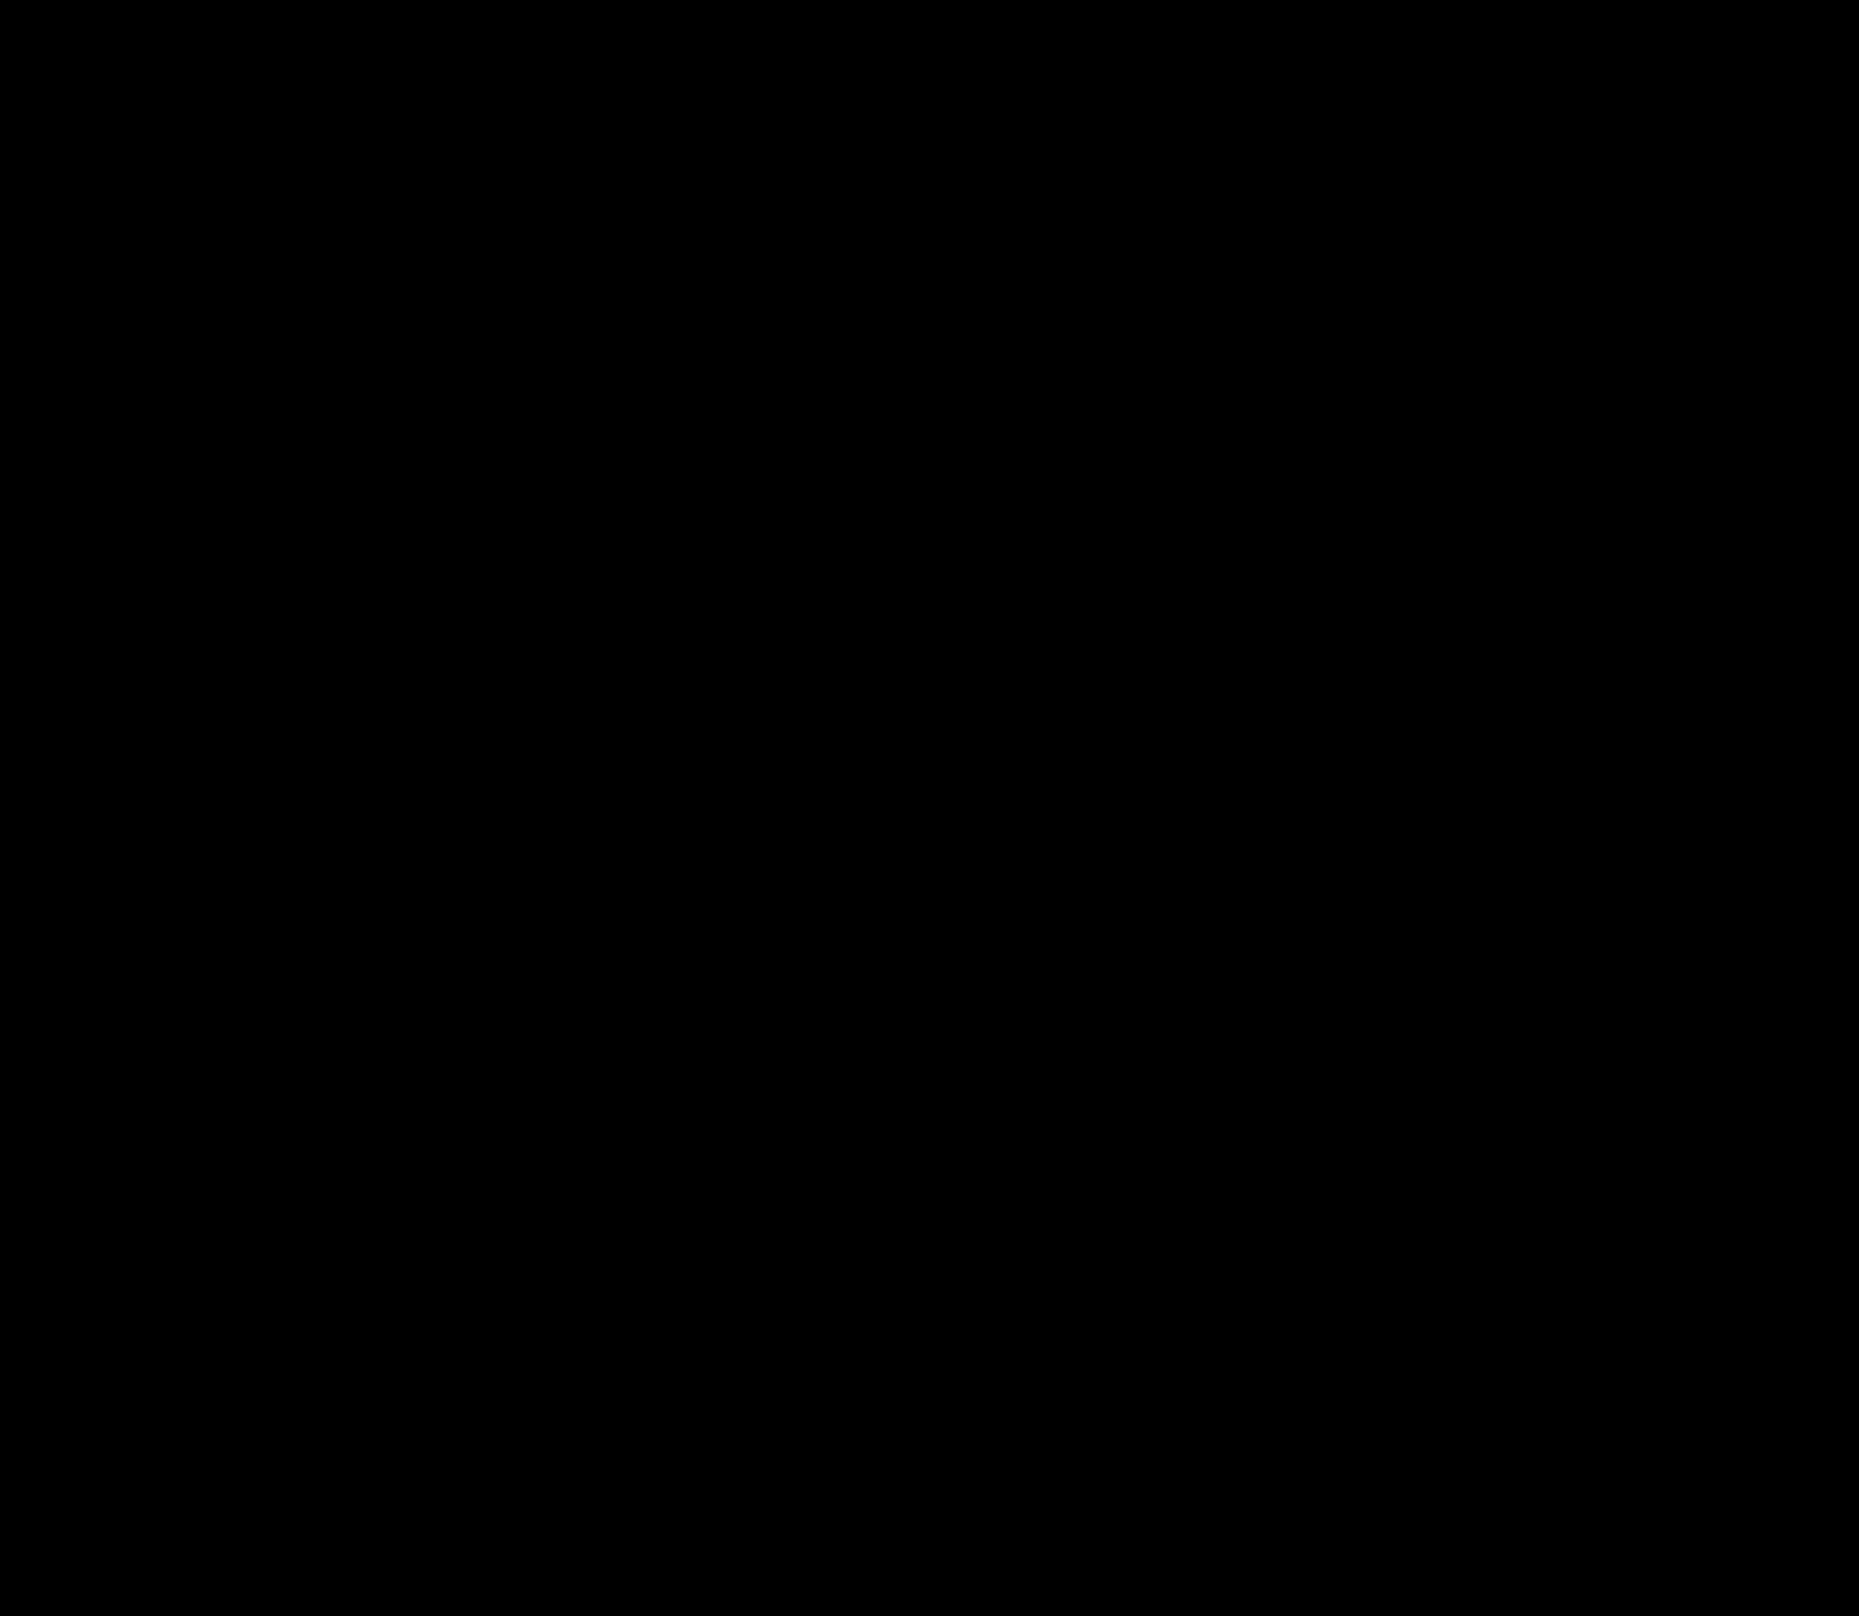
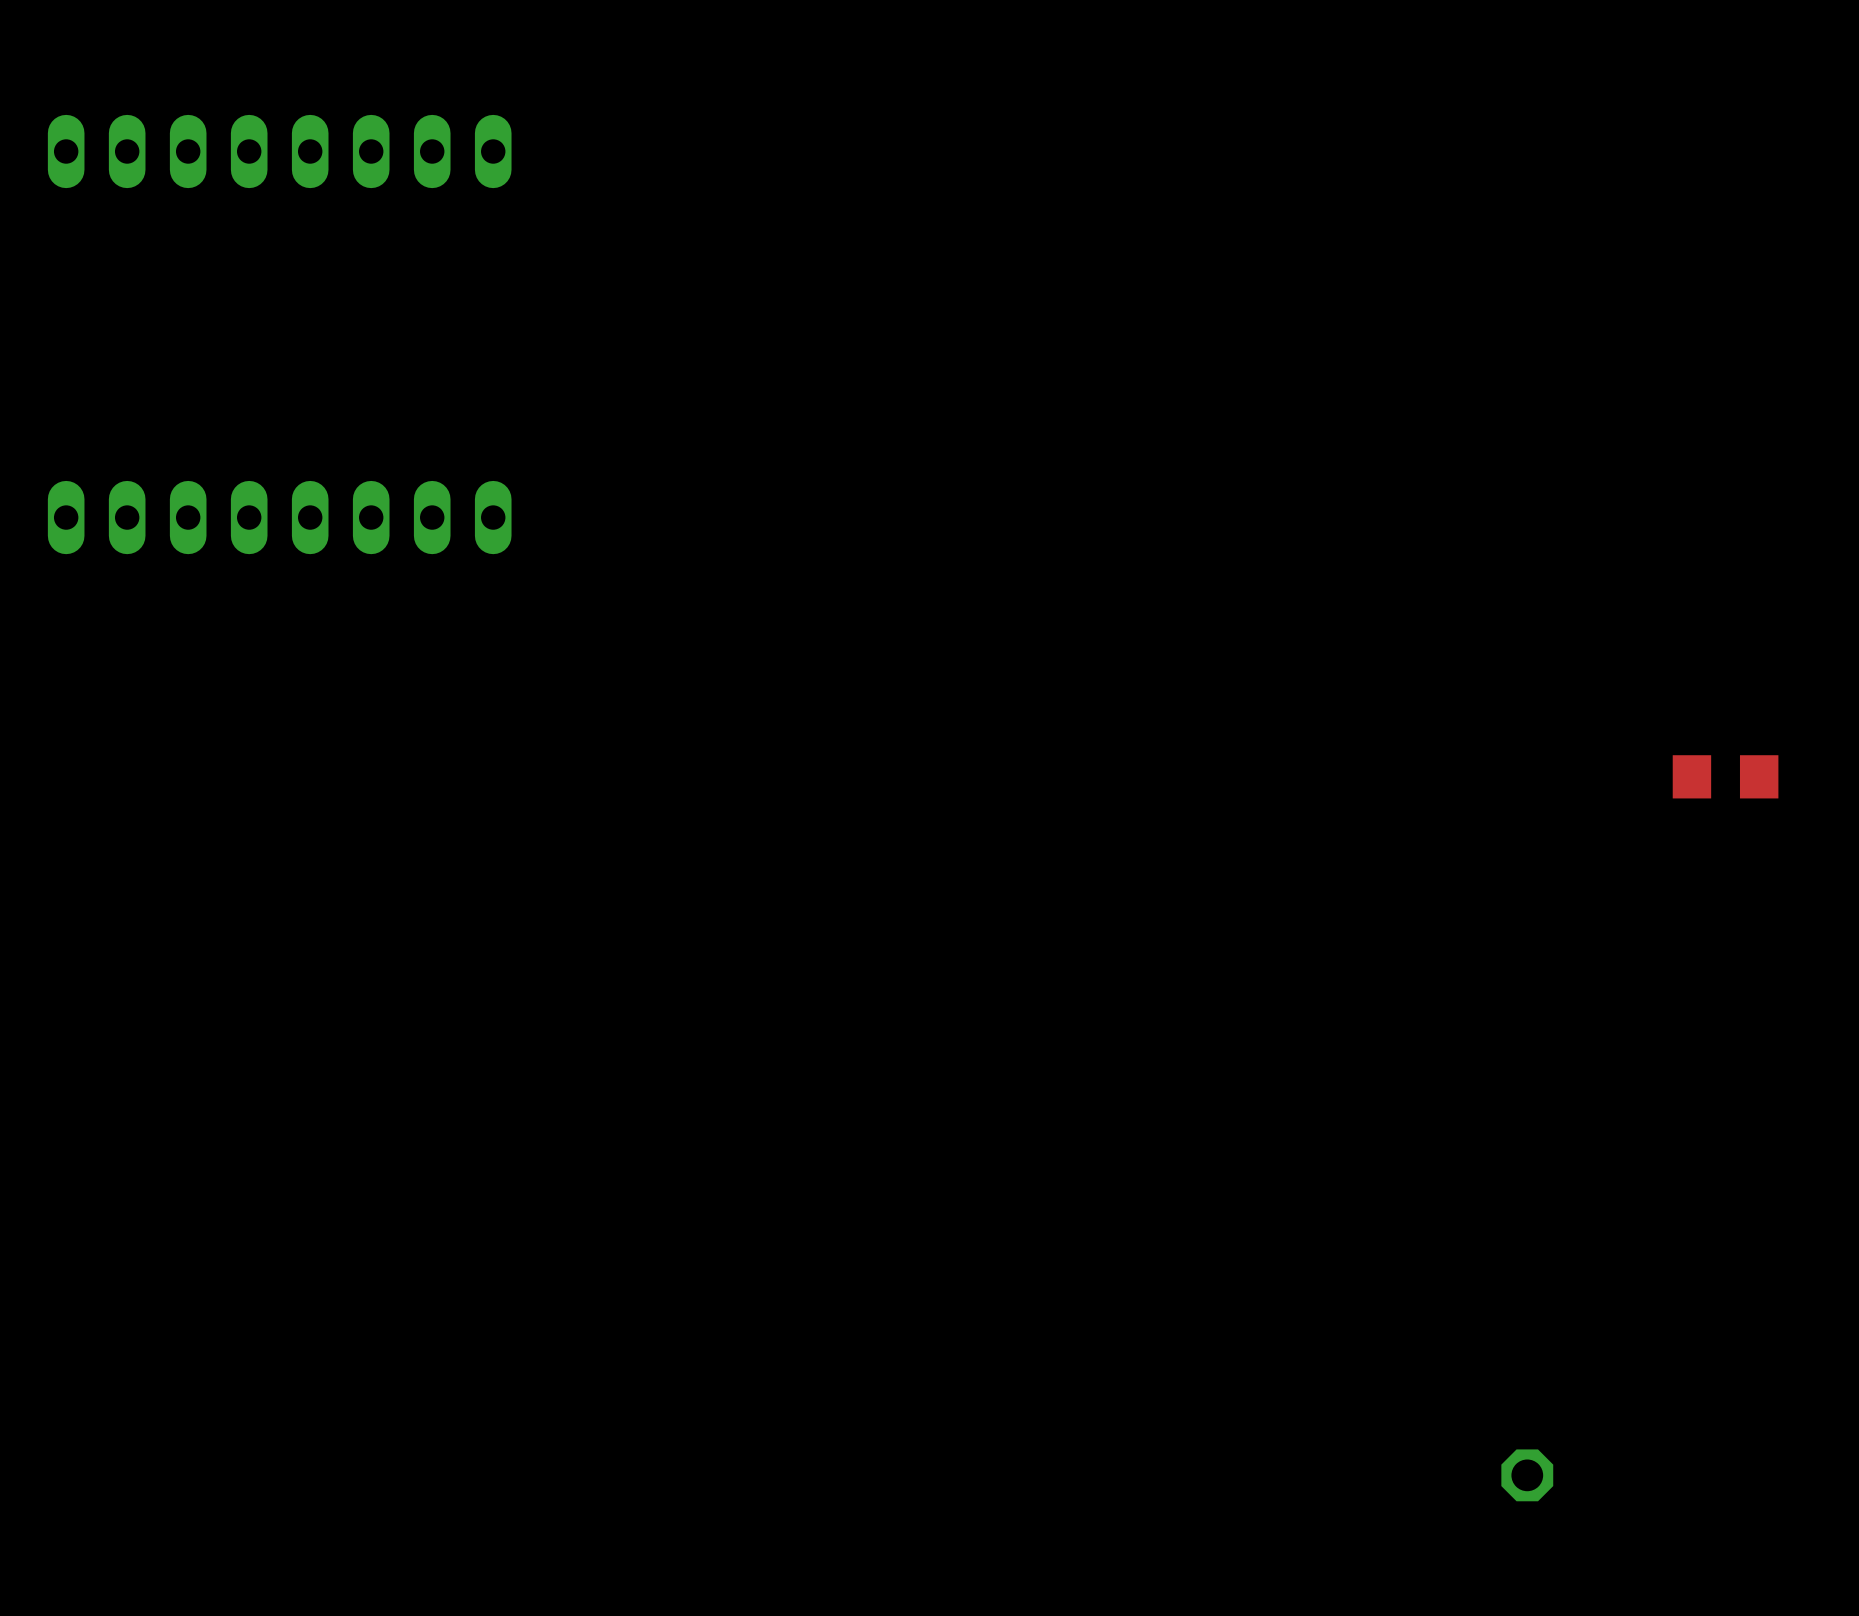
part: none -> (279, 151)
part: none -> (279, 517)
part: none -> (1725, 776)
part: none -> (1527, 1475)

